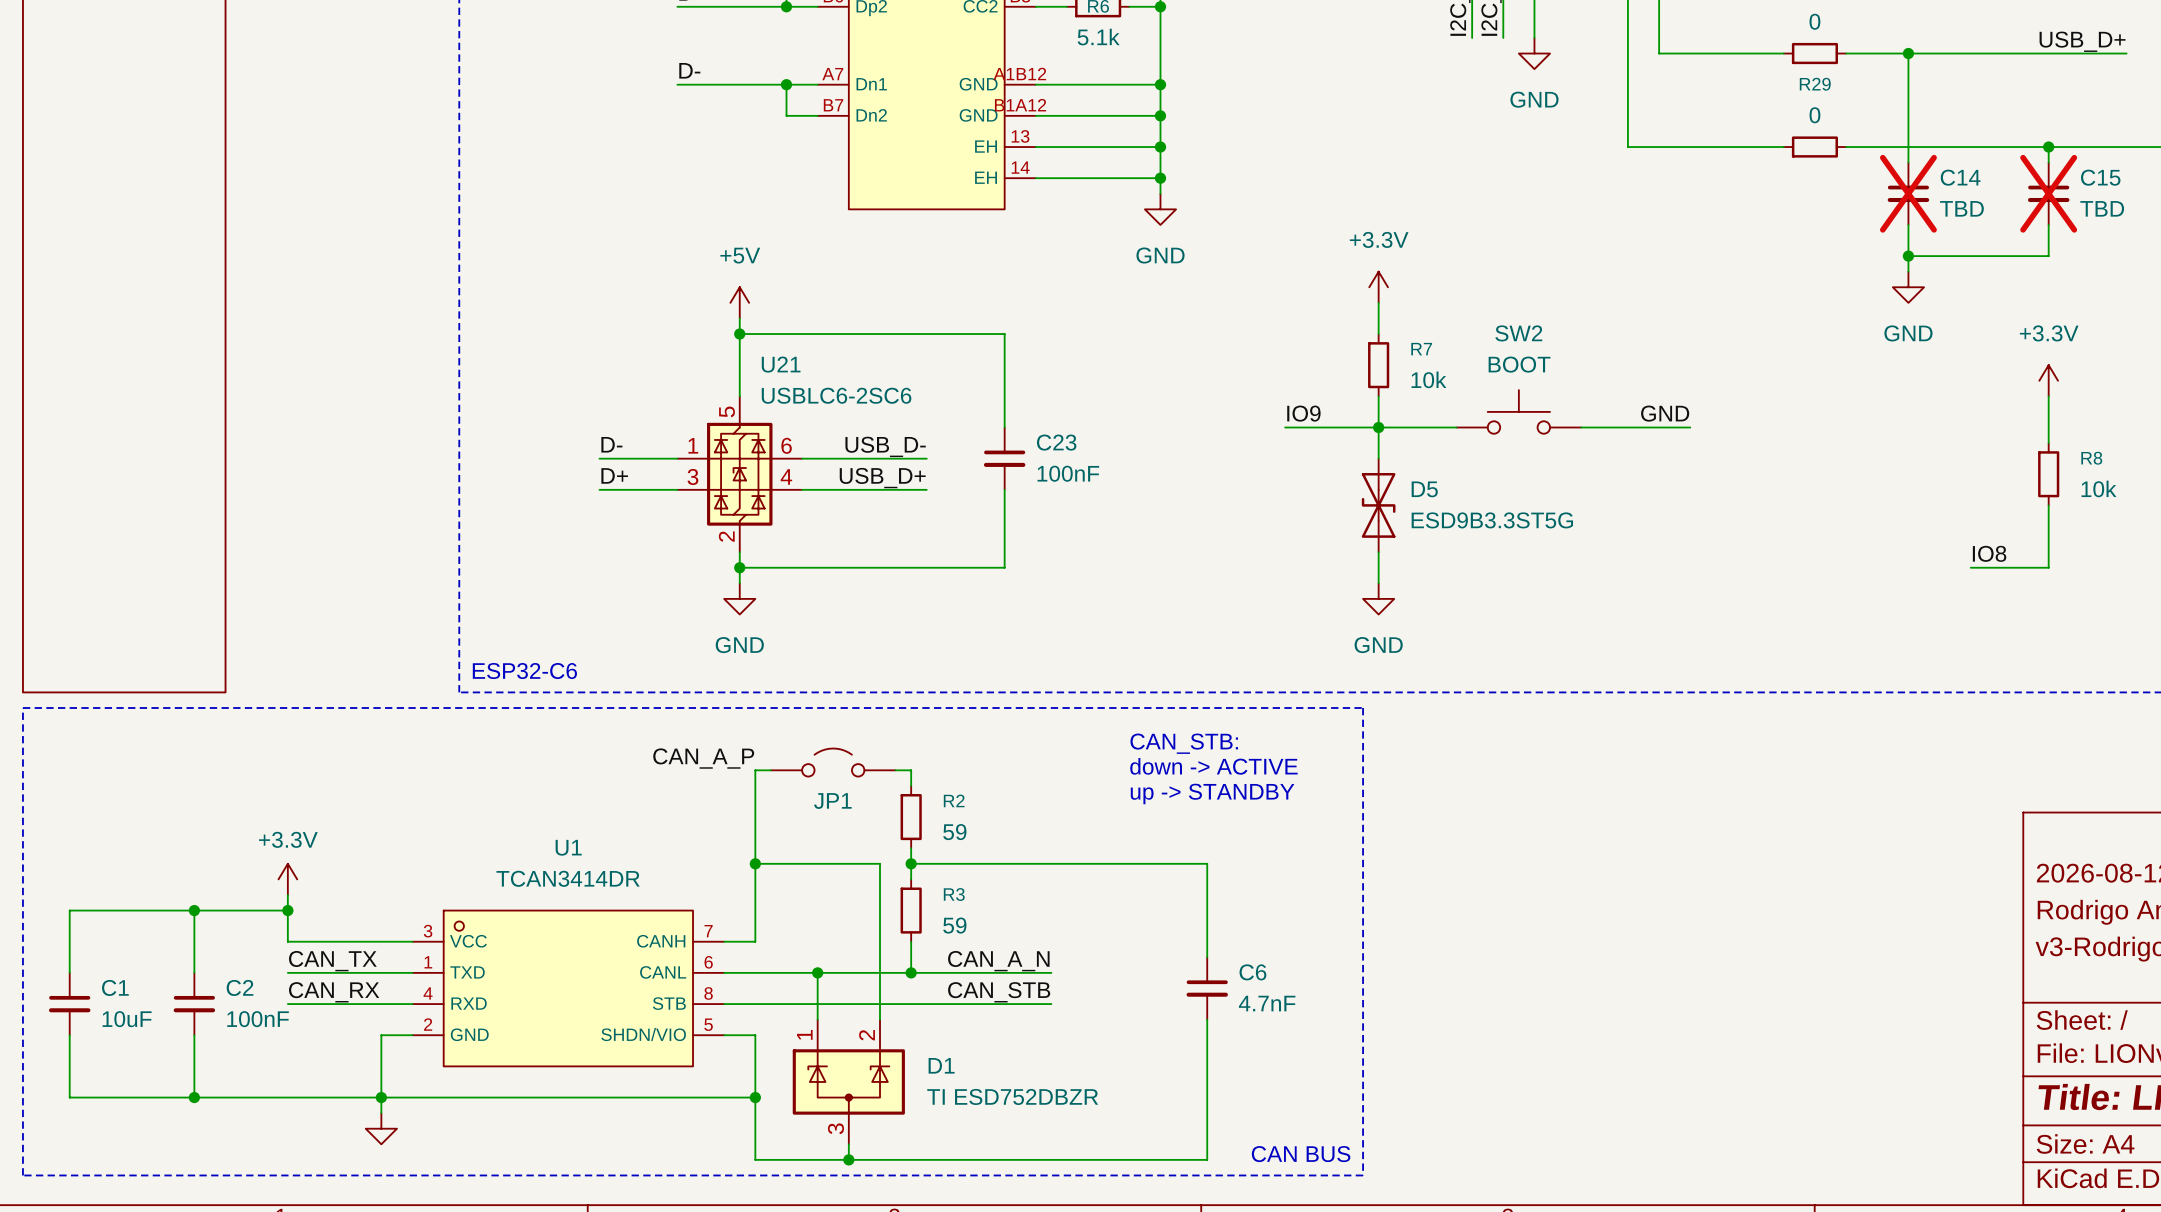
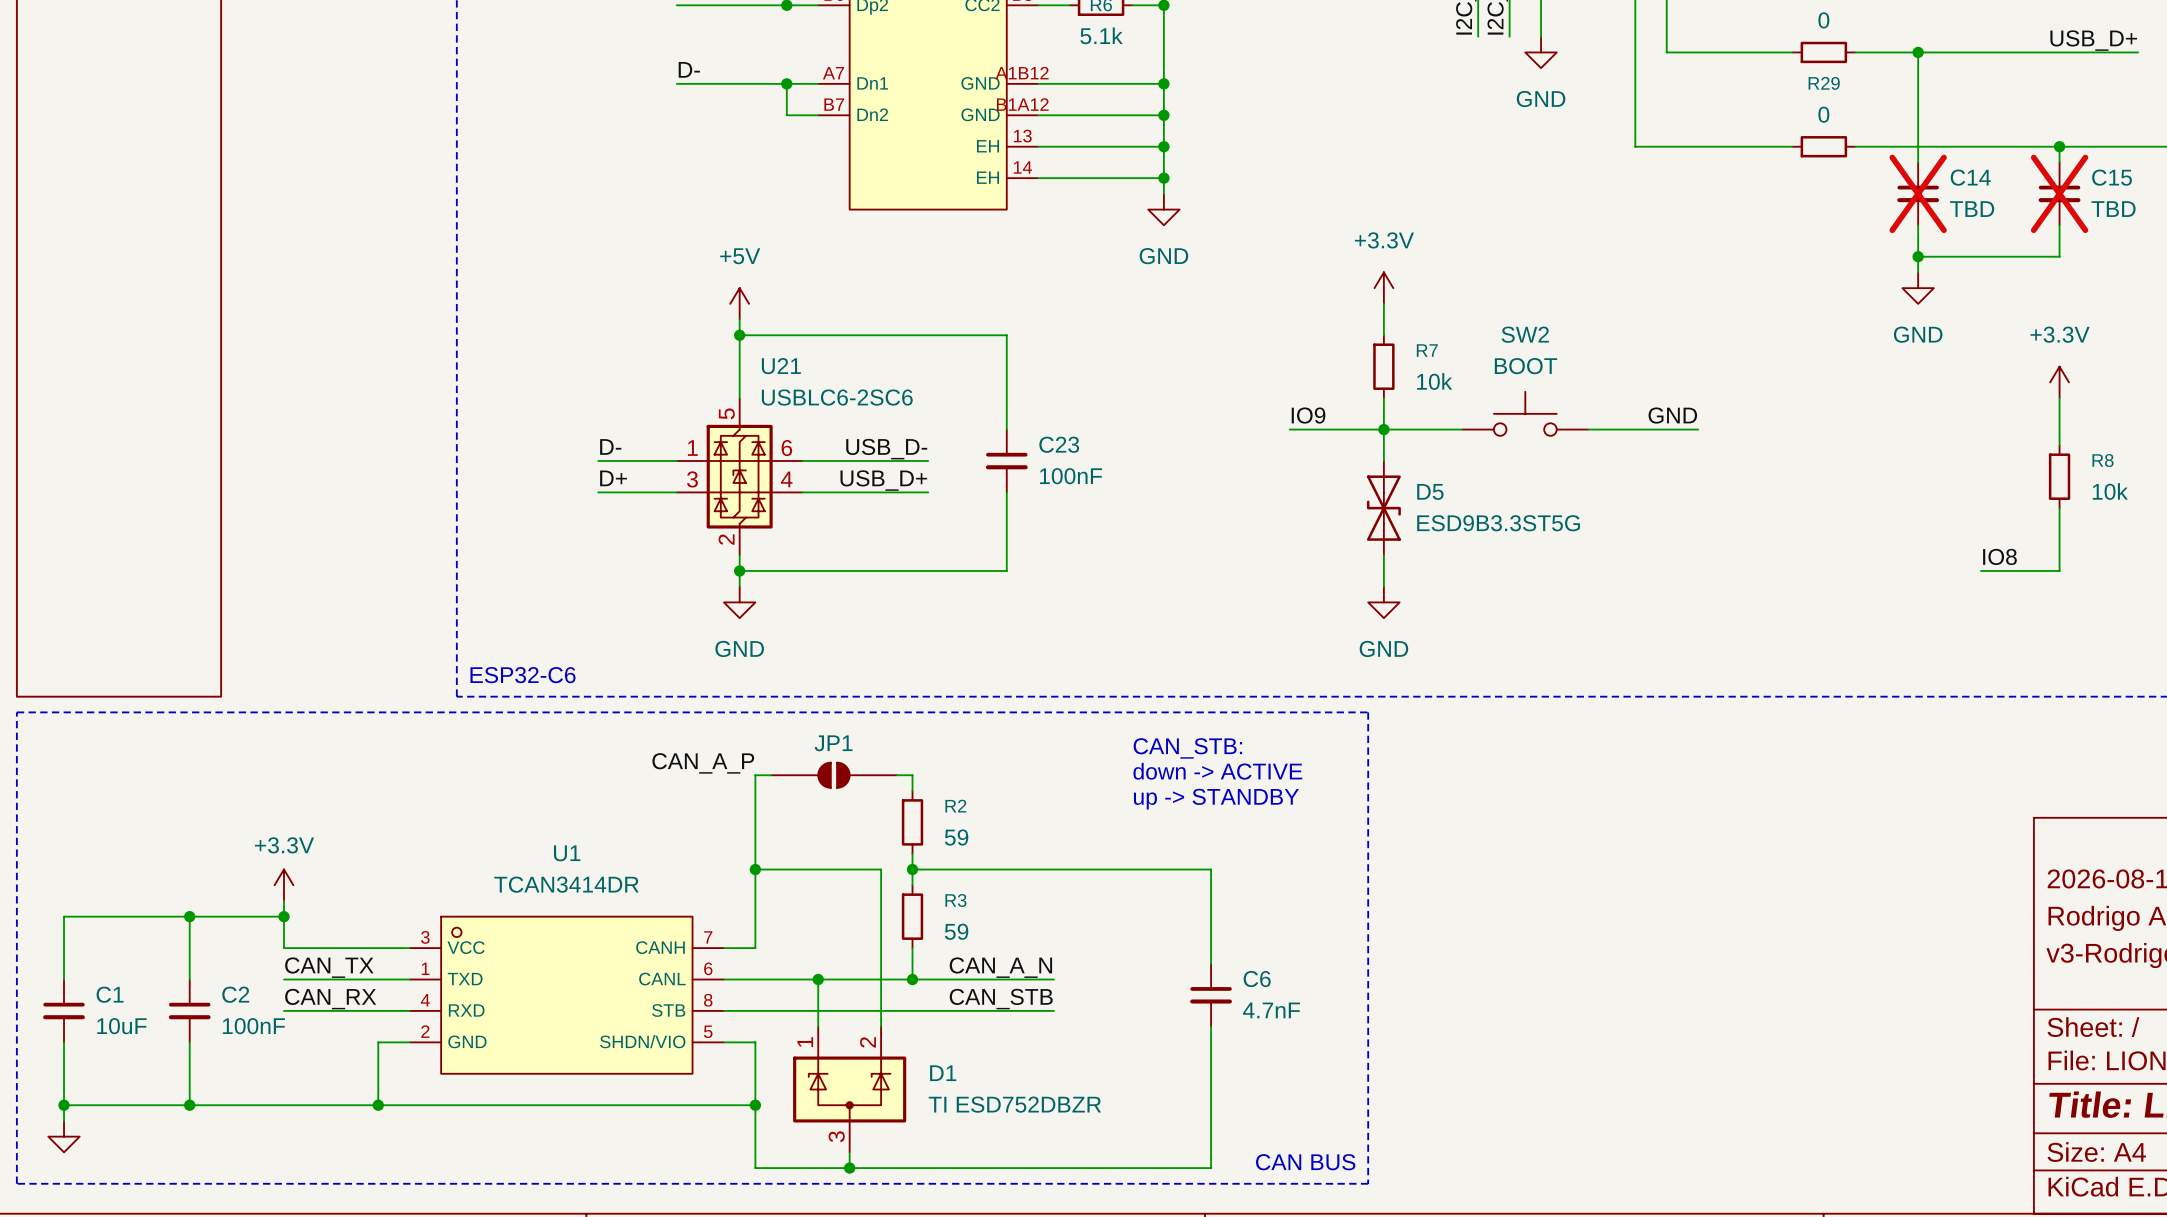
JP1 symbol: [770, 748, 896, 777] -> [771, 761, 897, 789]
JP1 name position: JP1 (832, 801) -> JP1 (833, 743)
wire: none -> (64, 1105) (64, 1120)
junction: none -> (64, 1105)
wire: (381, 1097) (381, 1113) -> none
power symbol: none -> (64, 1136)
power symbol: (381, 1128) -> none

